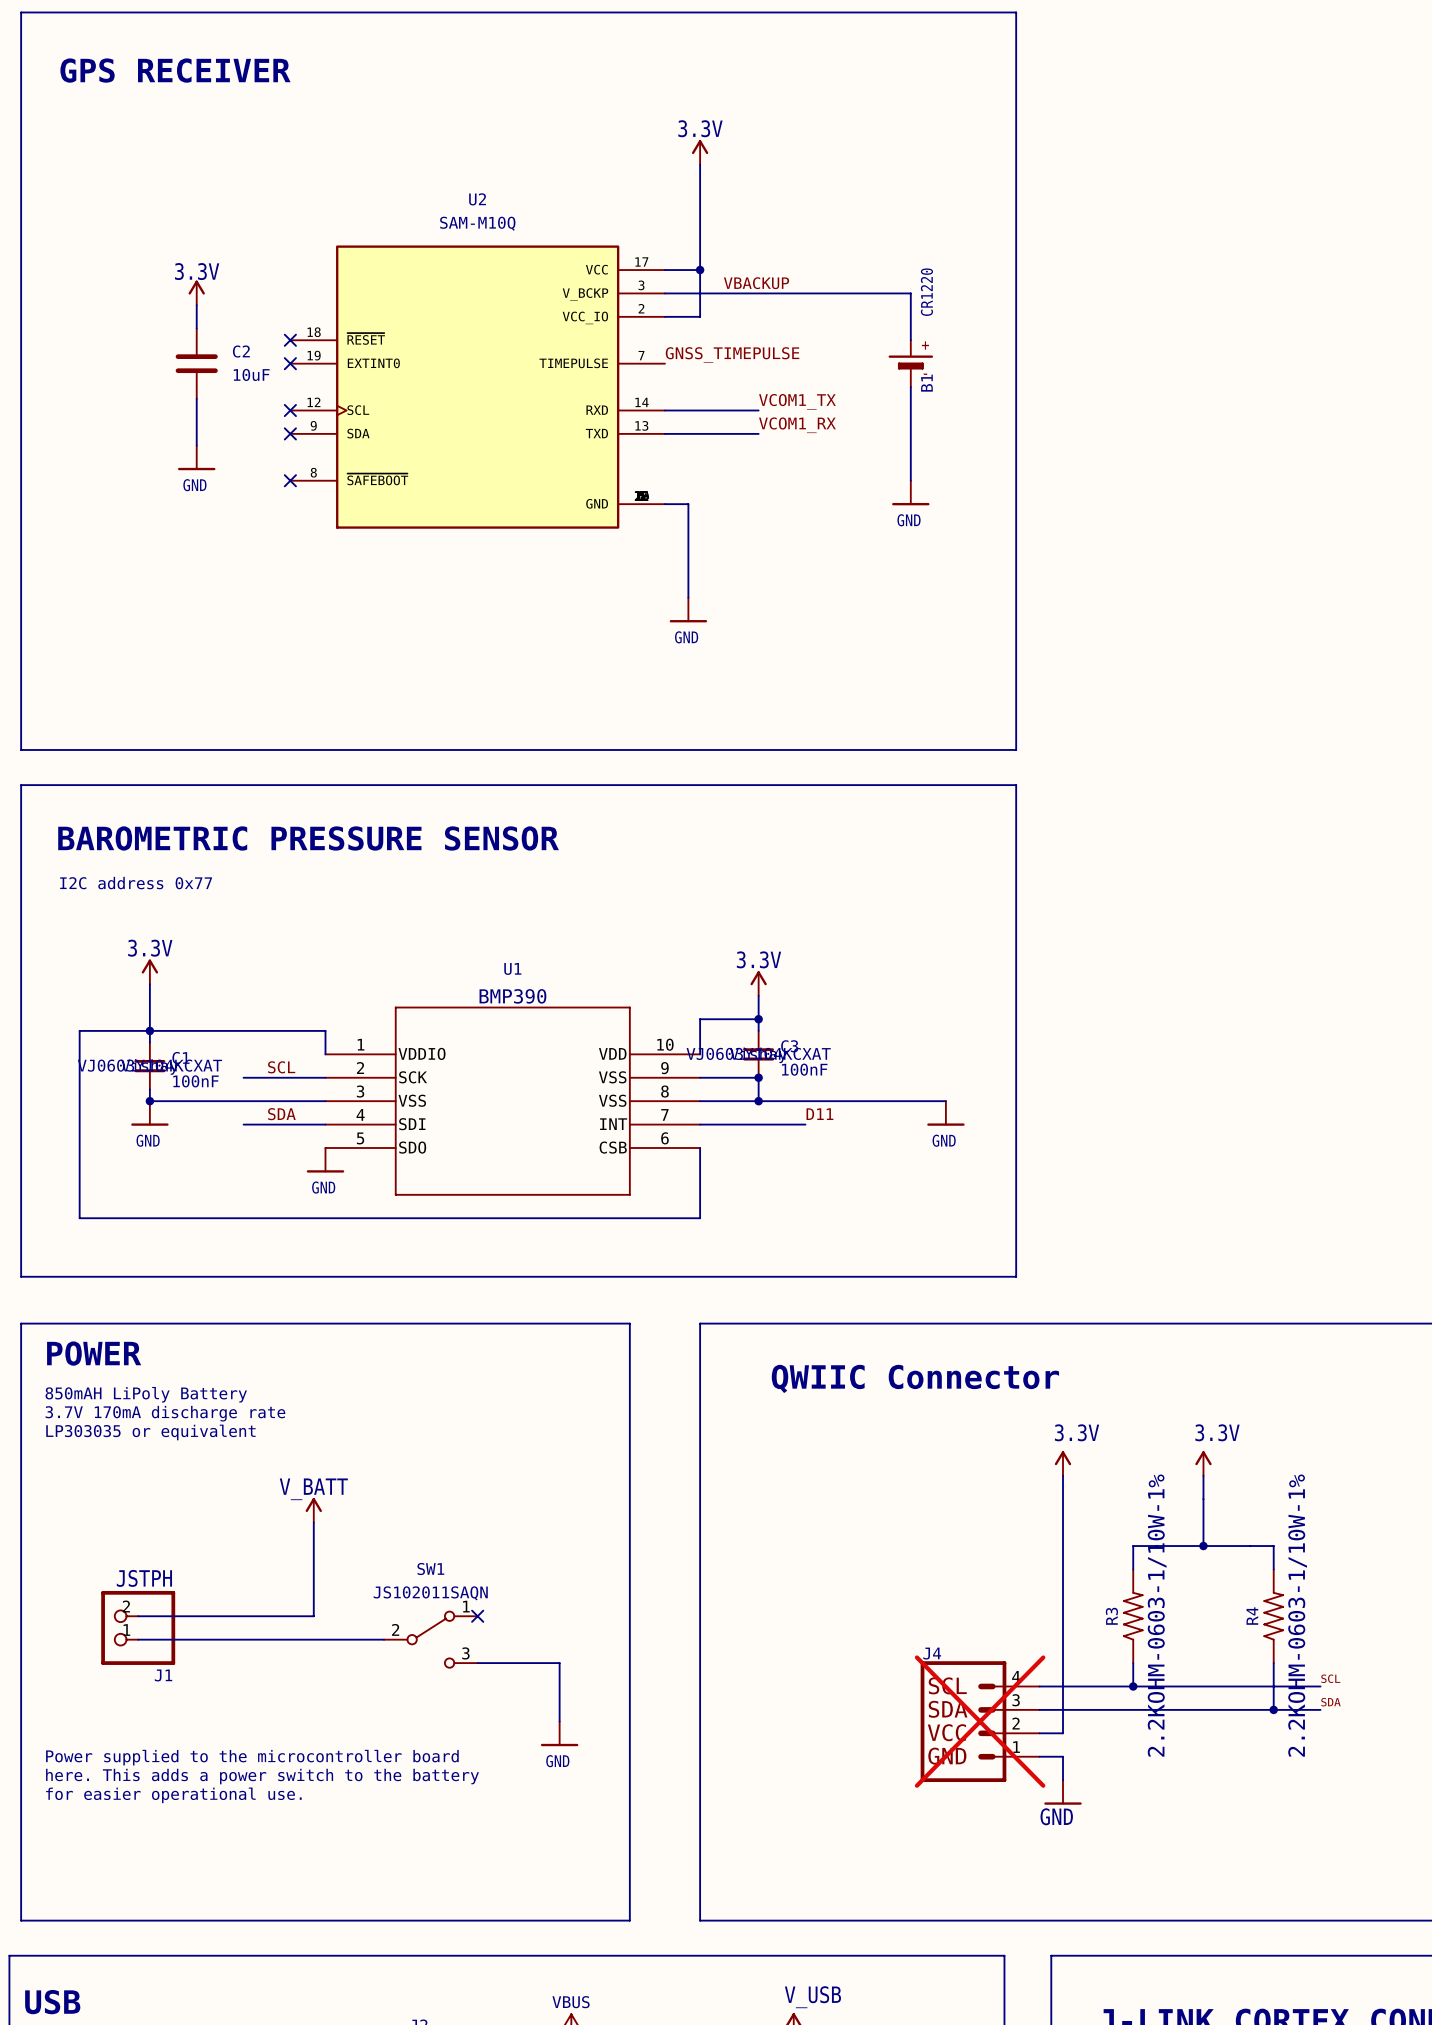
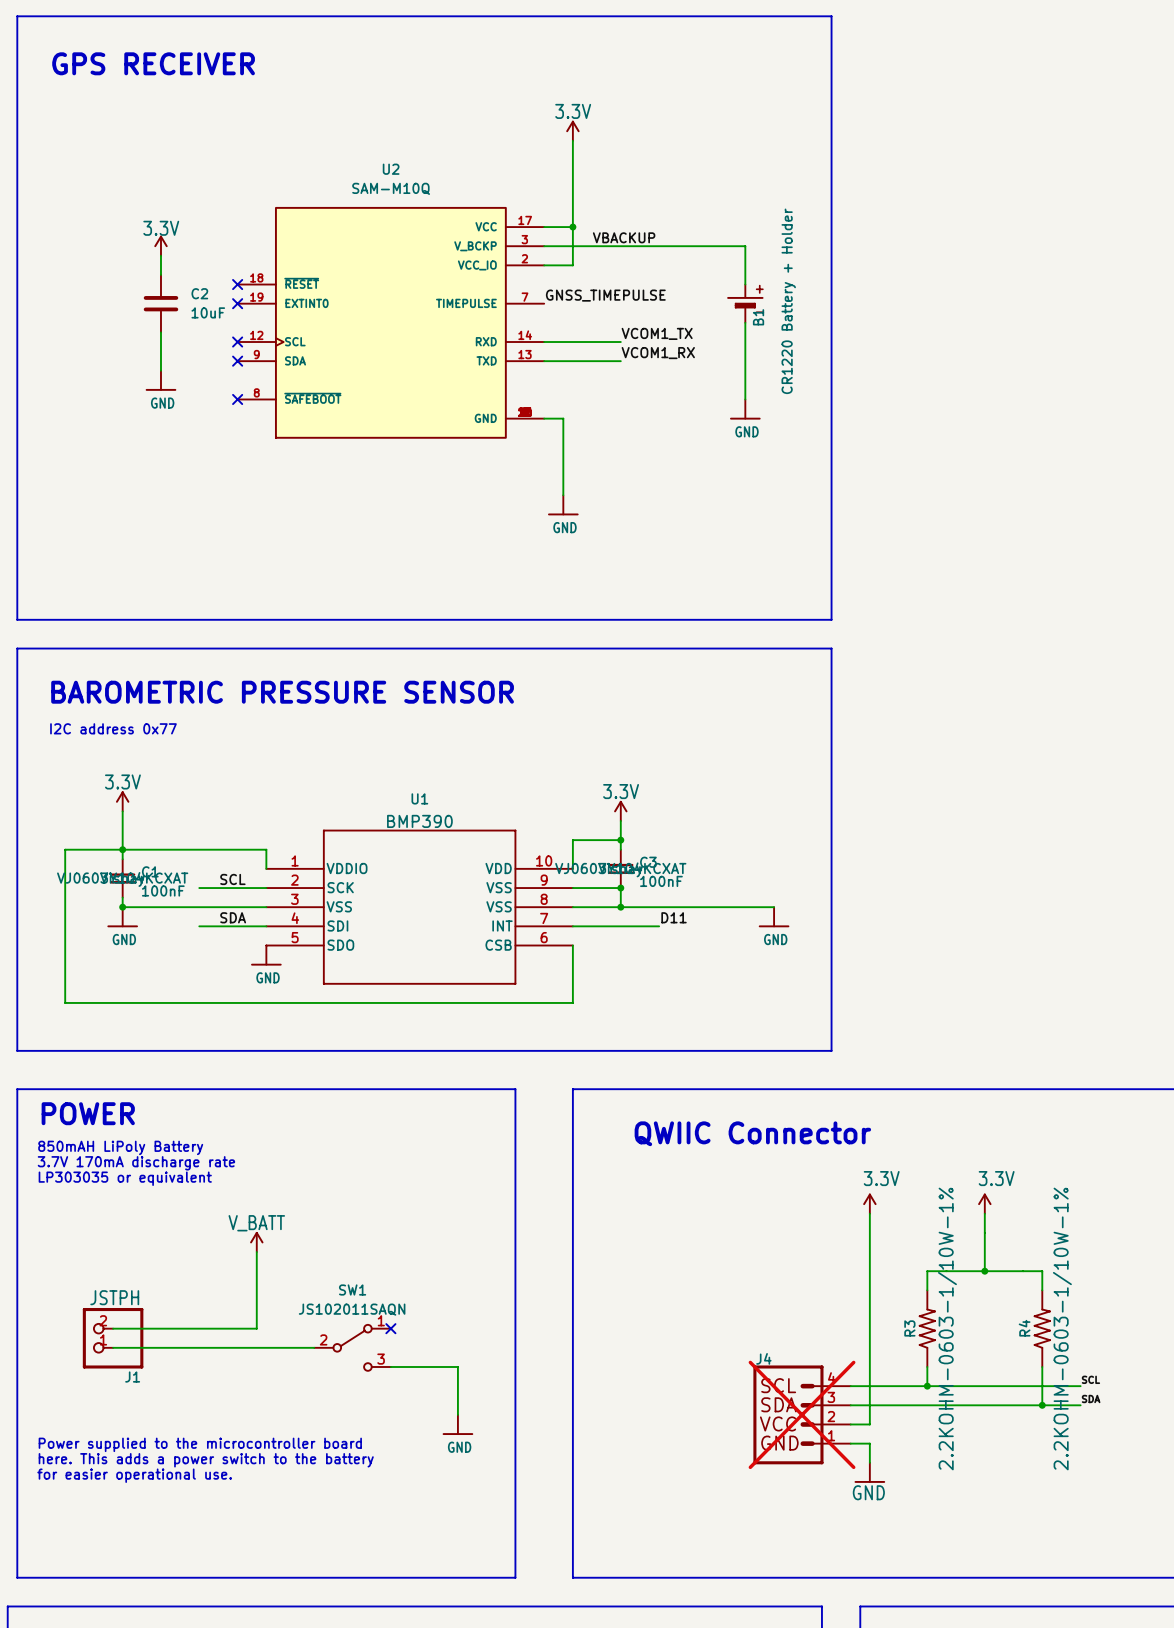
B1 value: CR1220 (926, 292) -> none
B1 text: none -> CR1220 Battery + Holder (788, 301)

